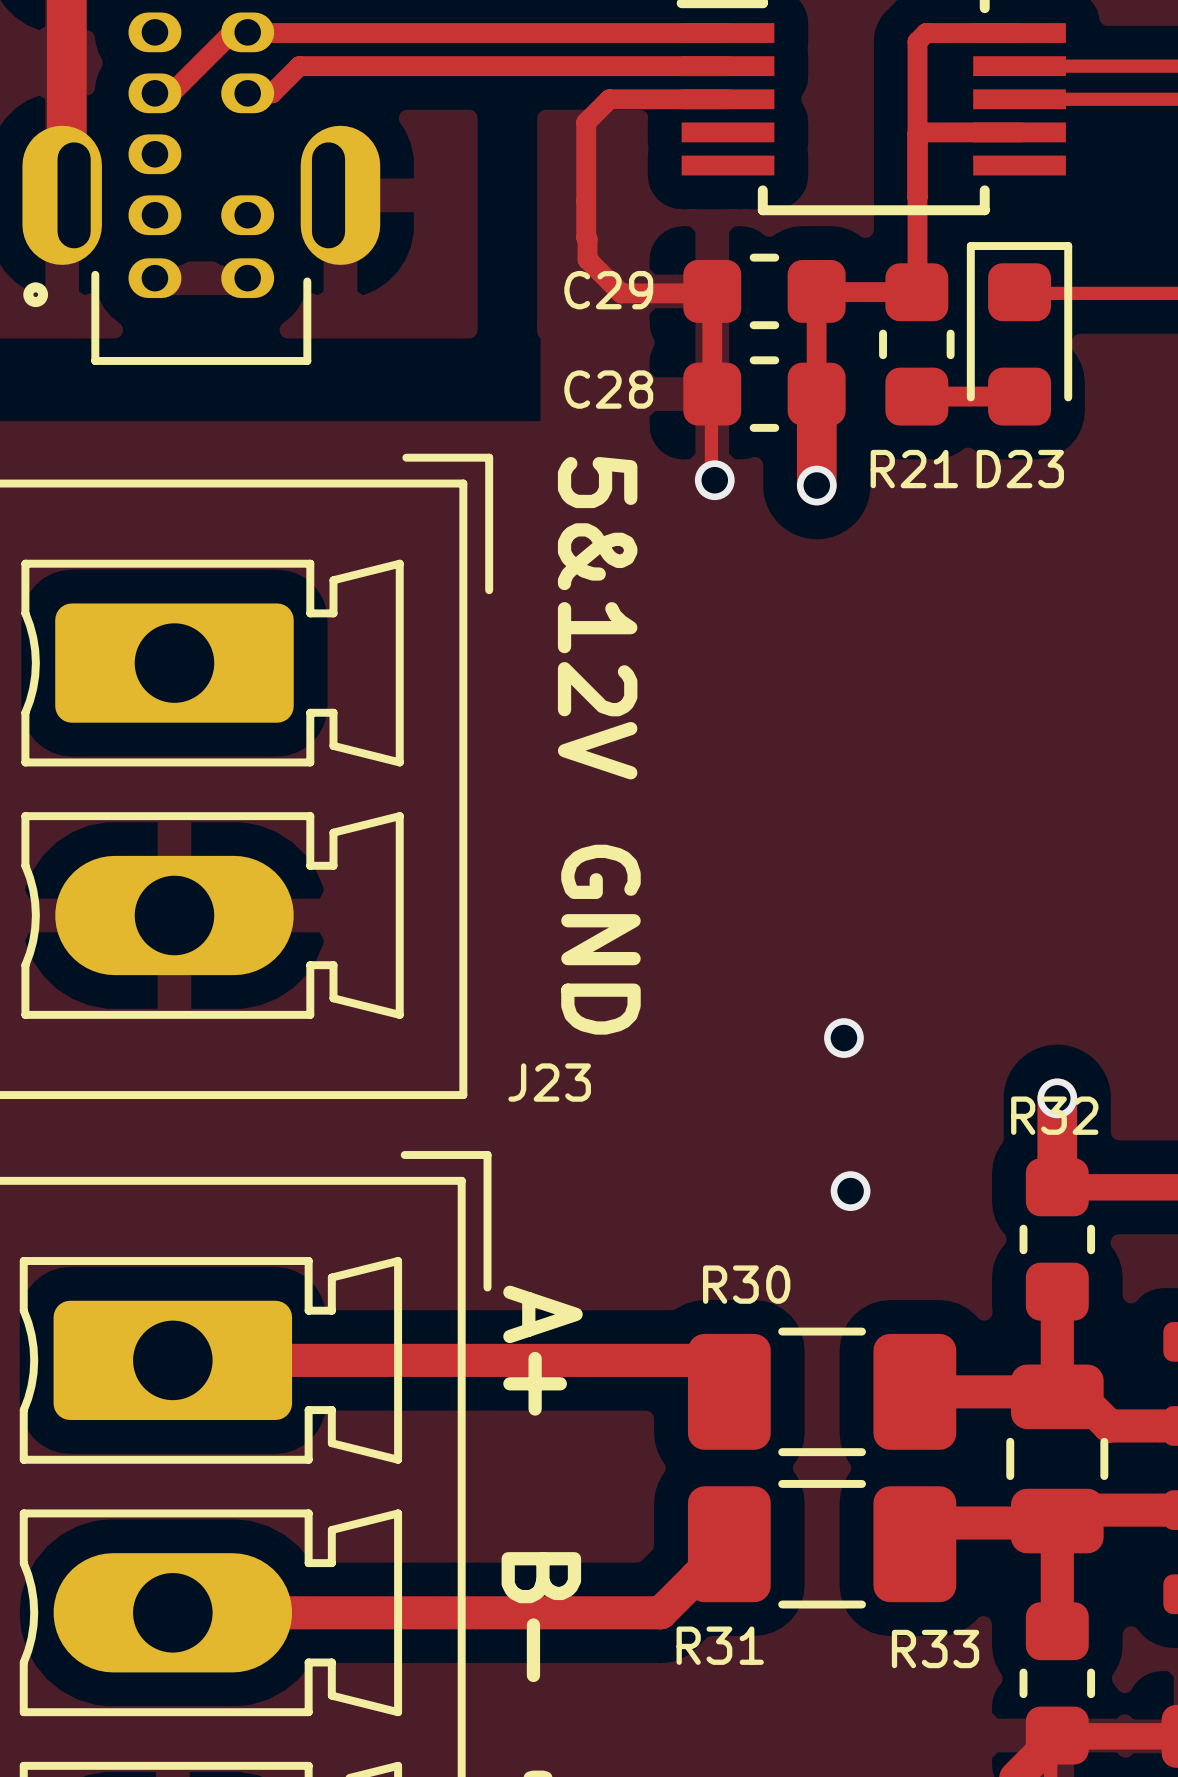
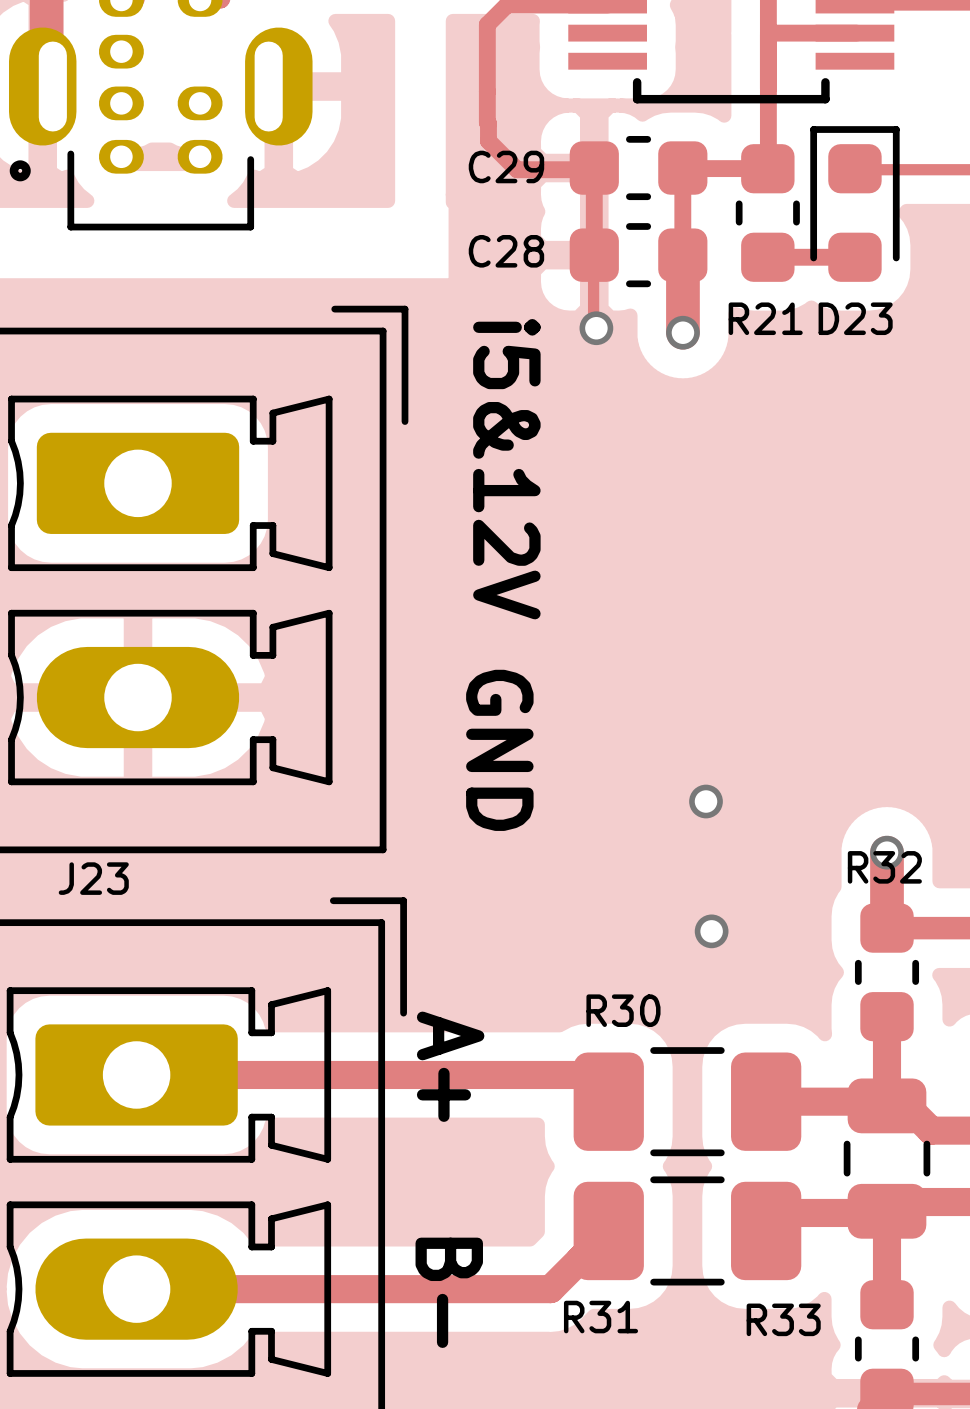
text: 5&12V (597, 618) -> i5&12V (506, 469)
text position: GND (600, 939) -> GND (499, 750)
J23 name position: J23 (549, 1082) -> J23 (93, 878)

